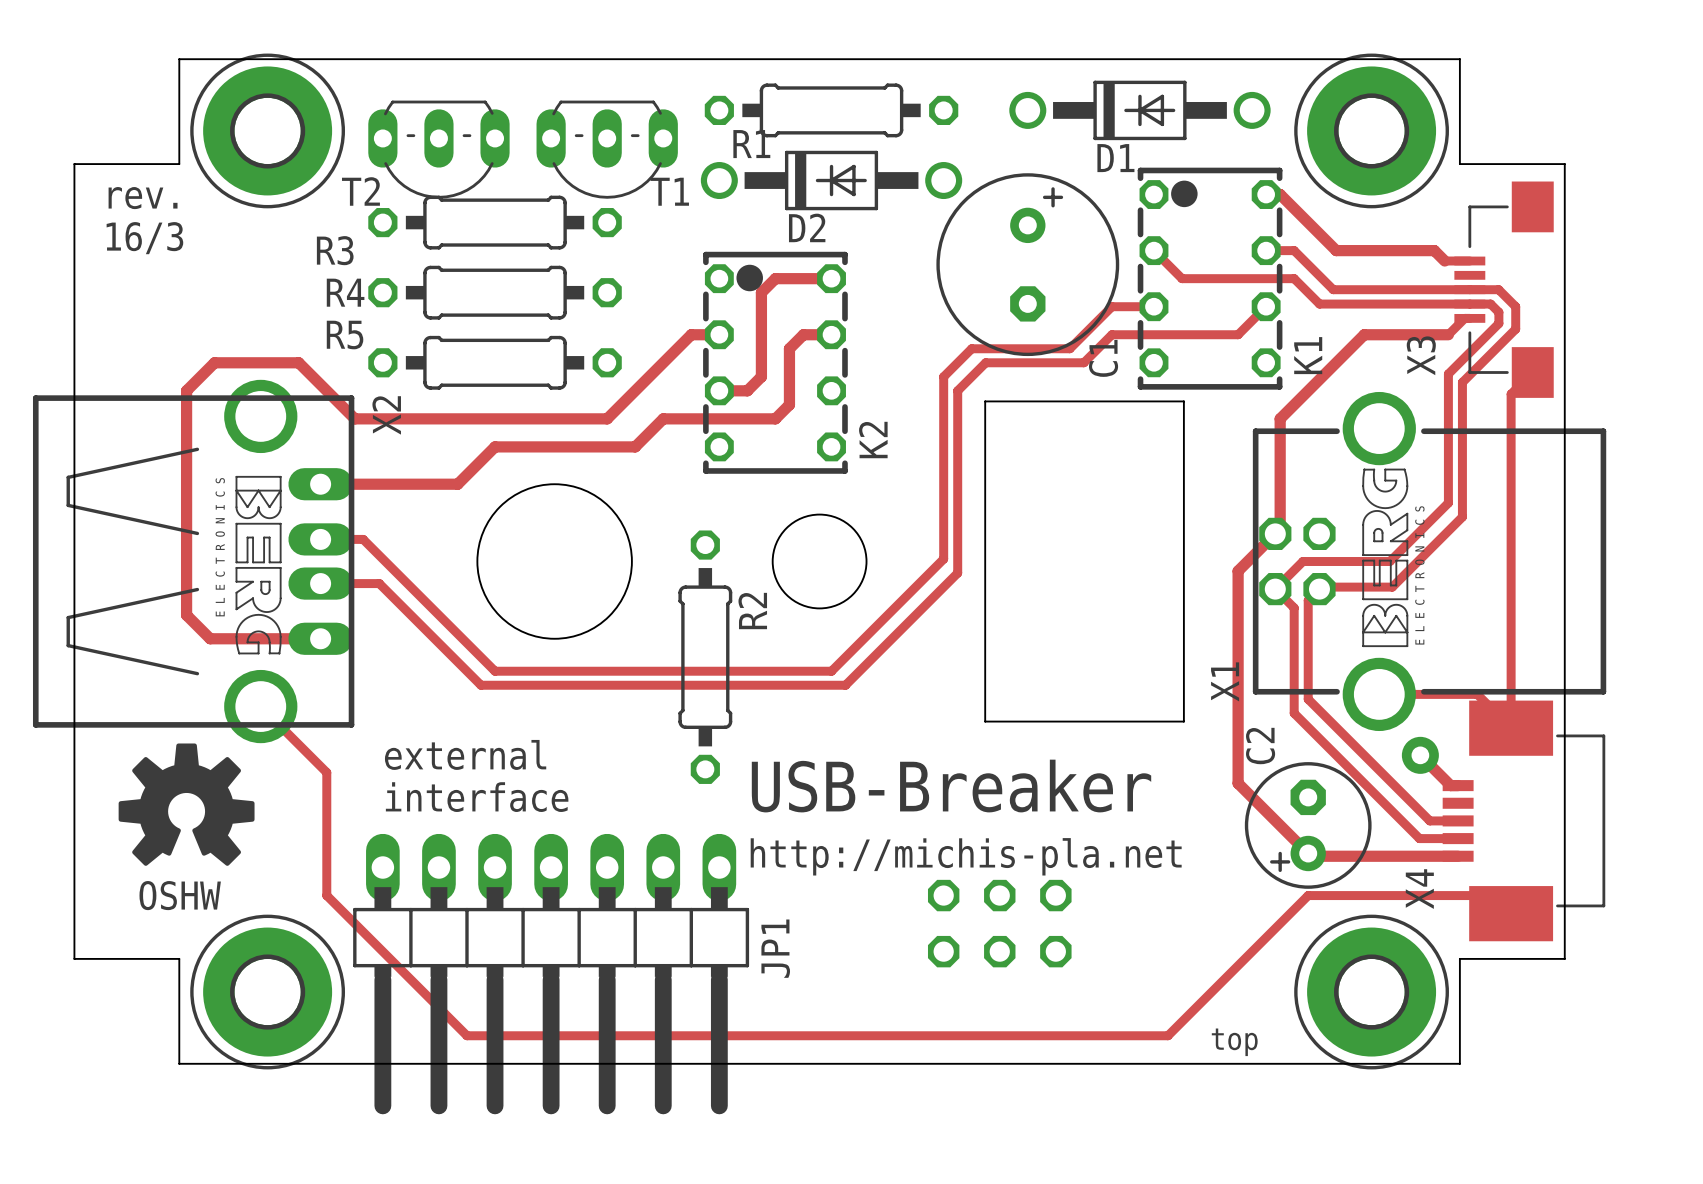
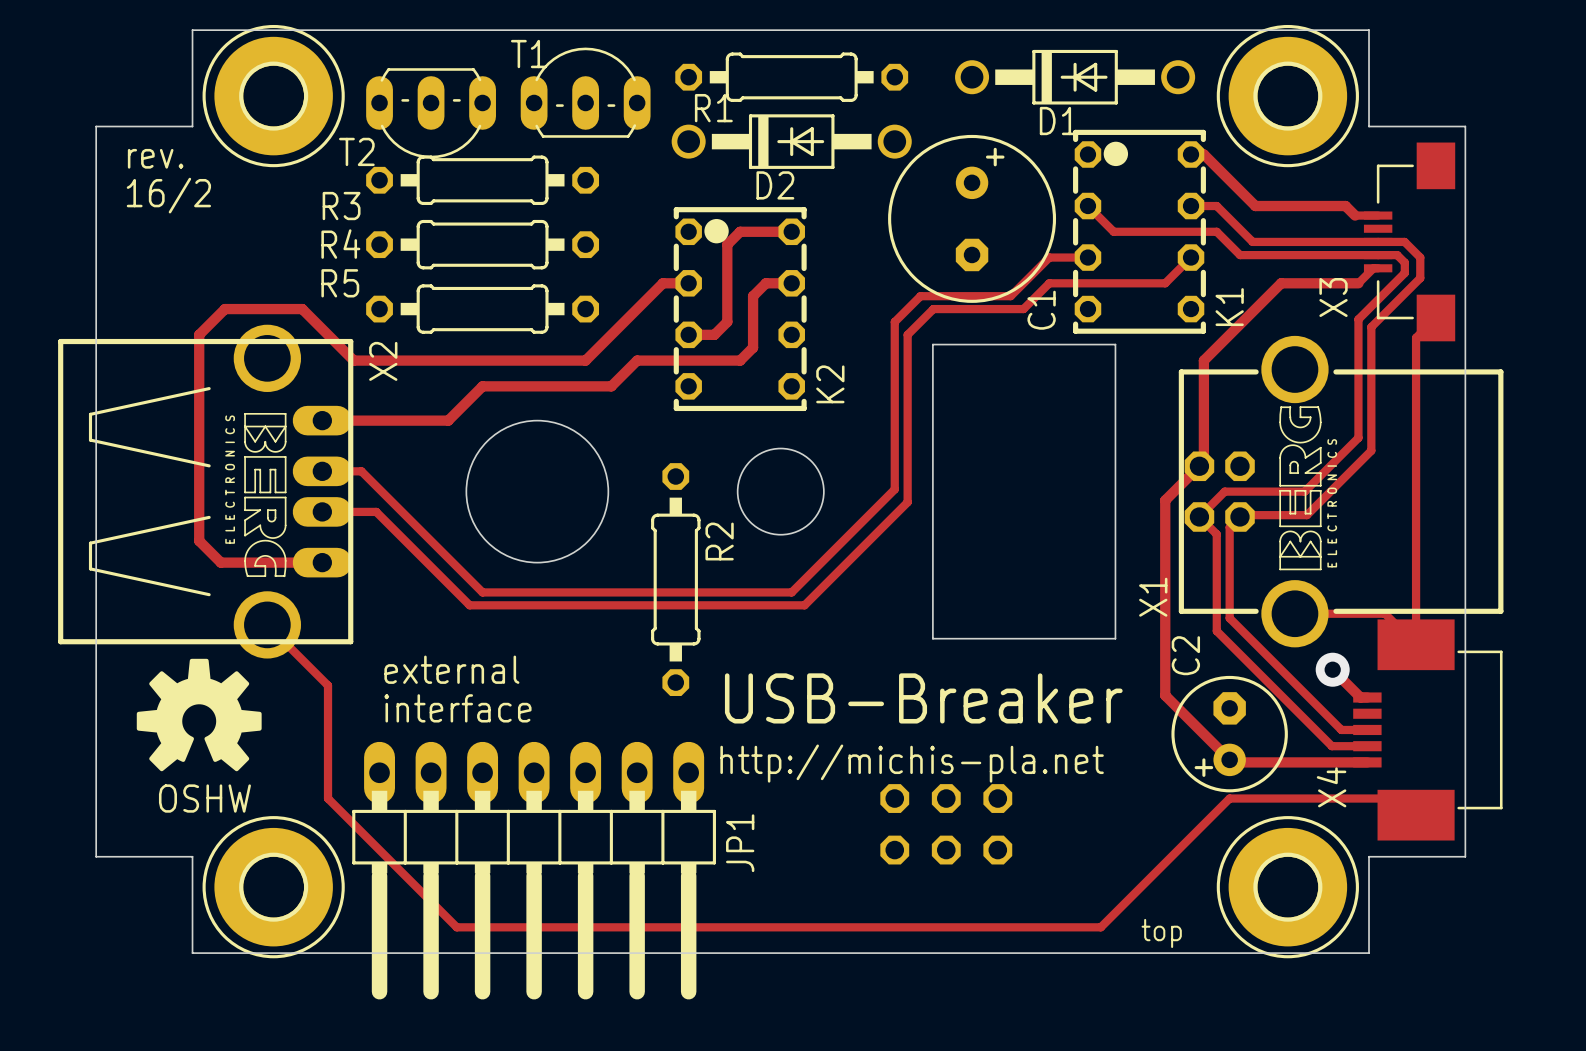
T1 rotation: 0° (607, 149) -> 180° (585, 92)
text: 16/3 (144, 238) -> 16/2 (168, 195)

